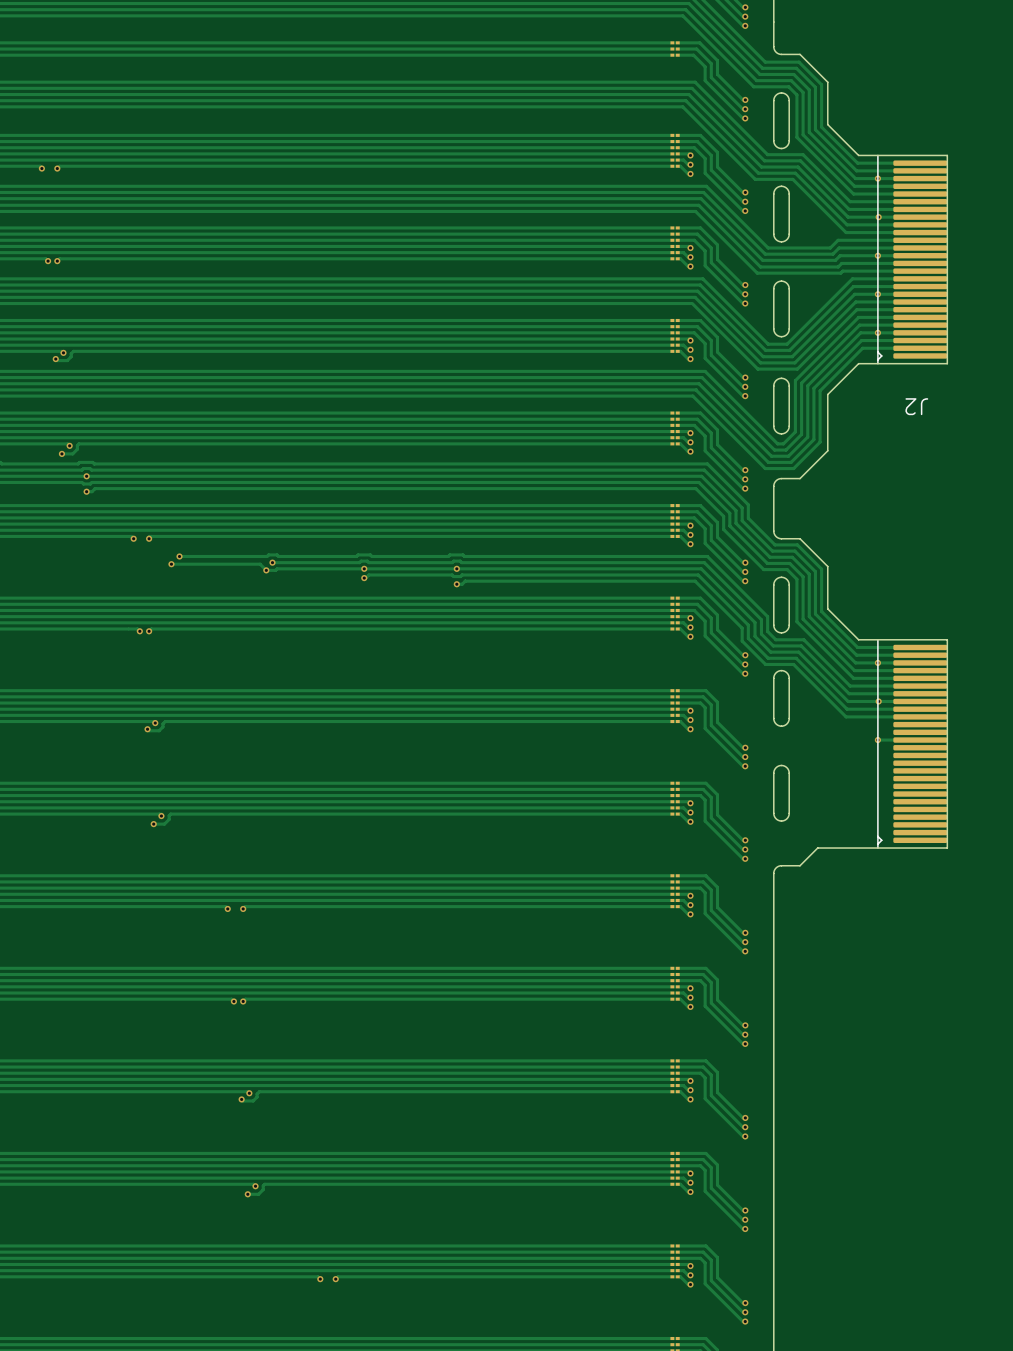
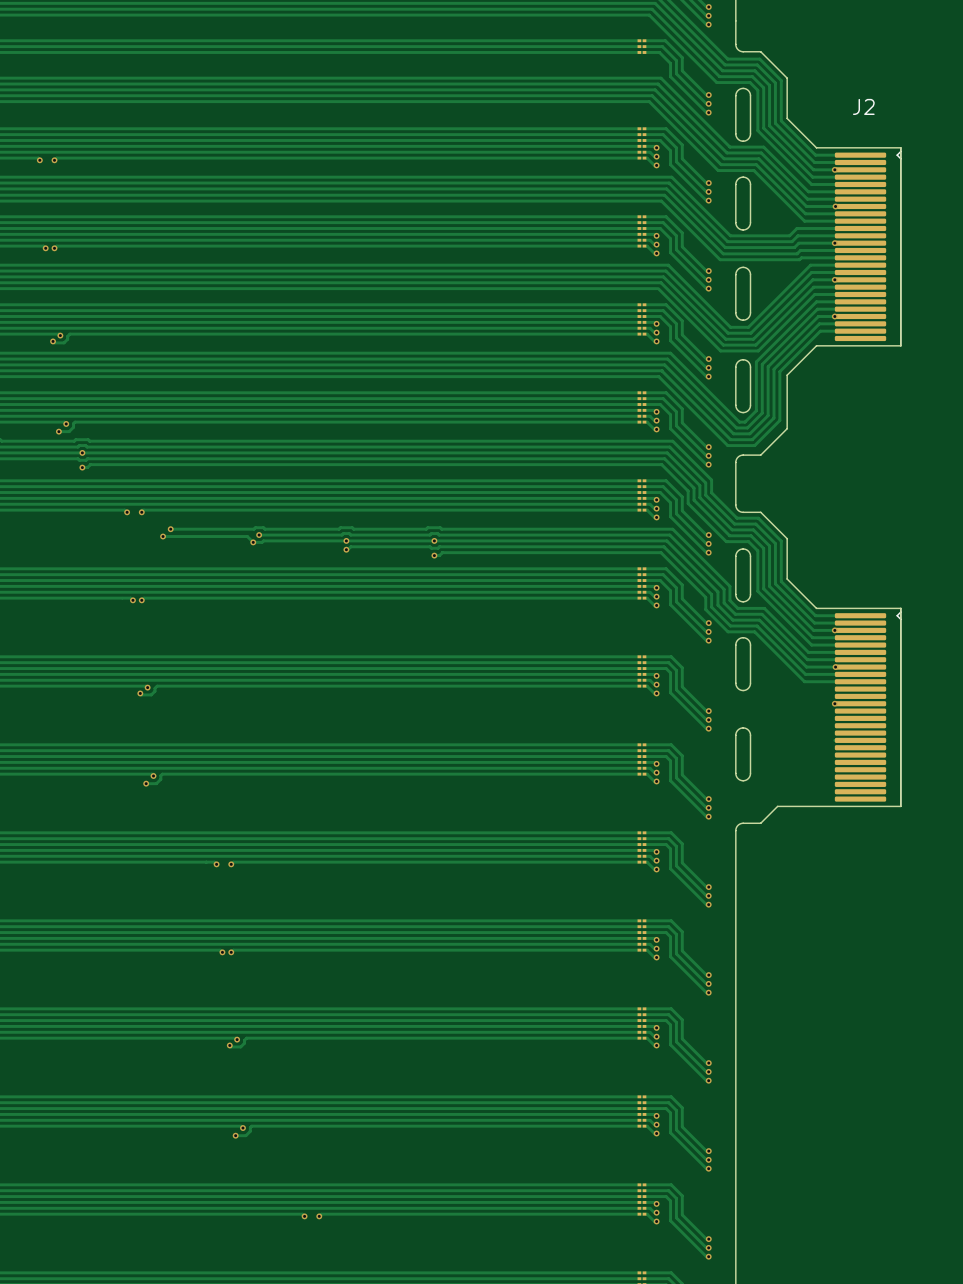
J2 rotation: 0° (912, 259) -> 180° (868, 246)
part rotation: 0° (912, 743) -> 180° (868, 707)

